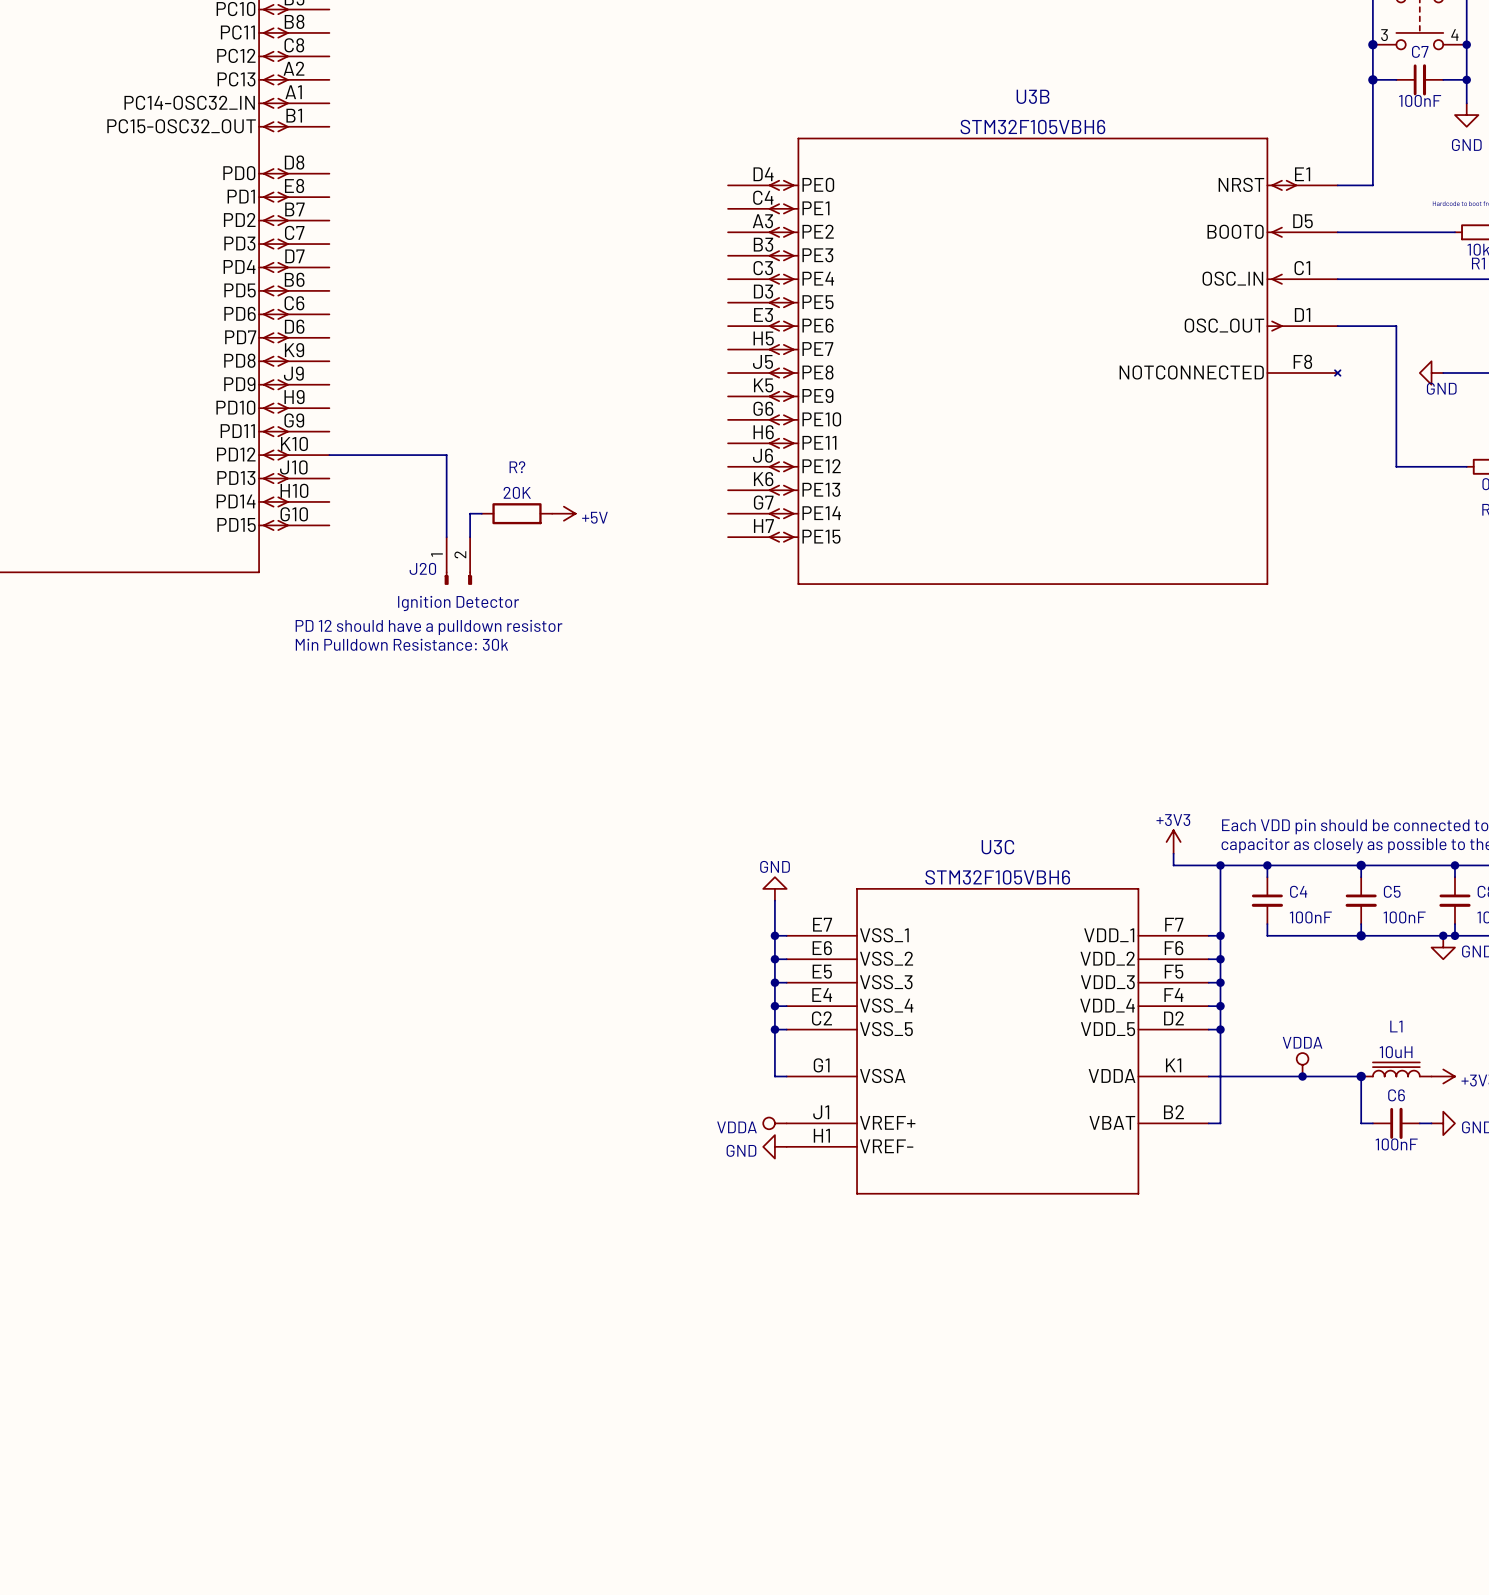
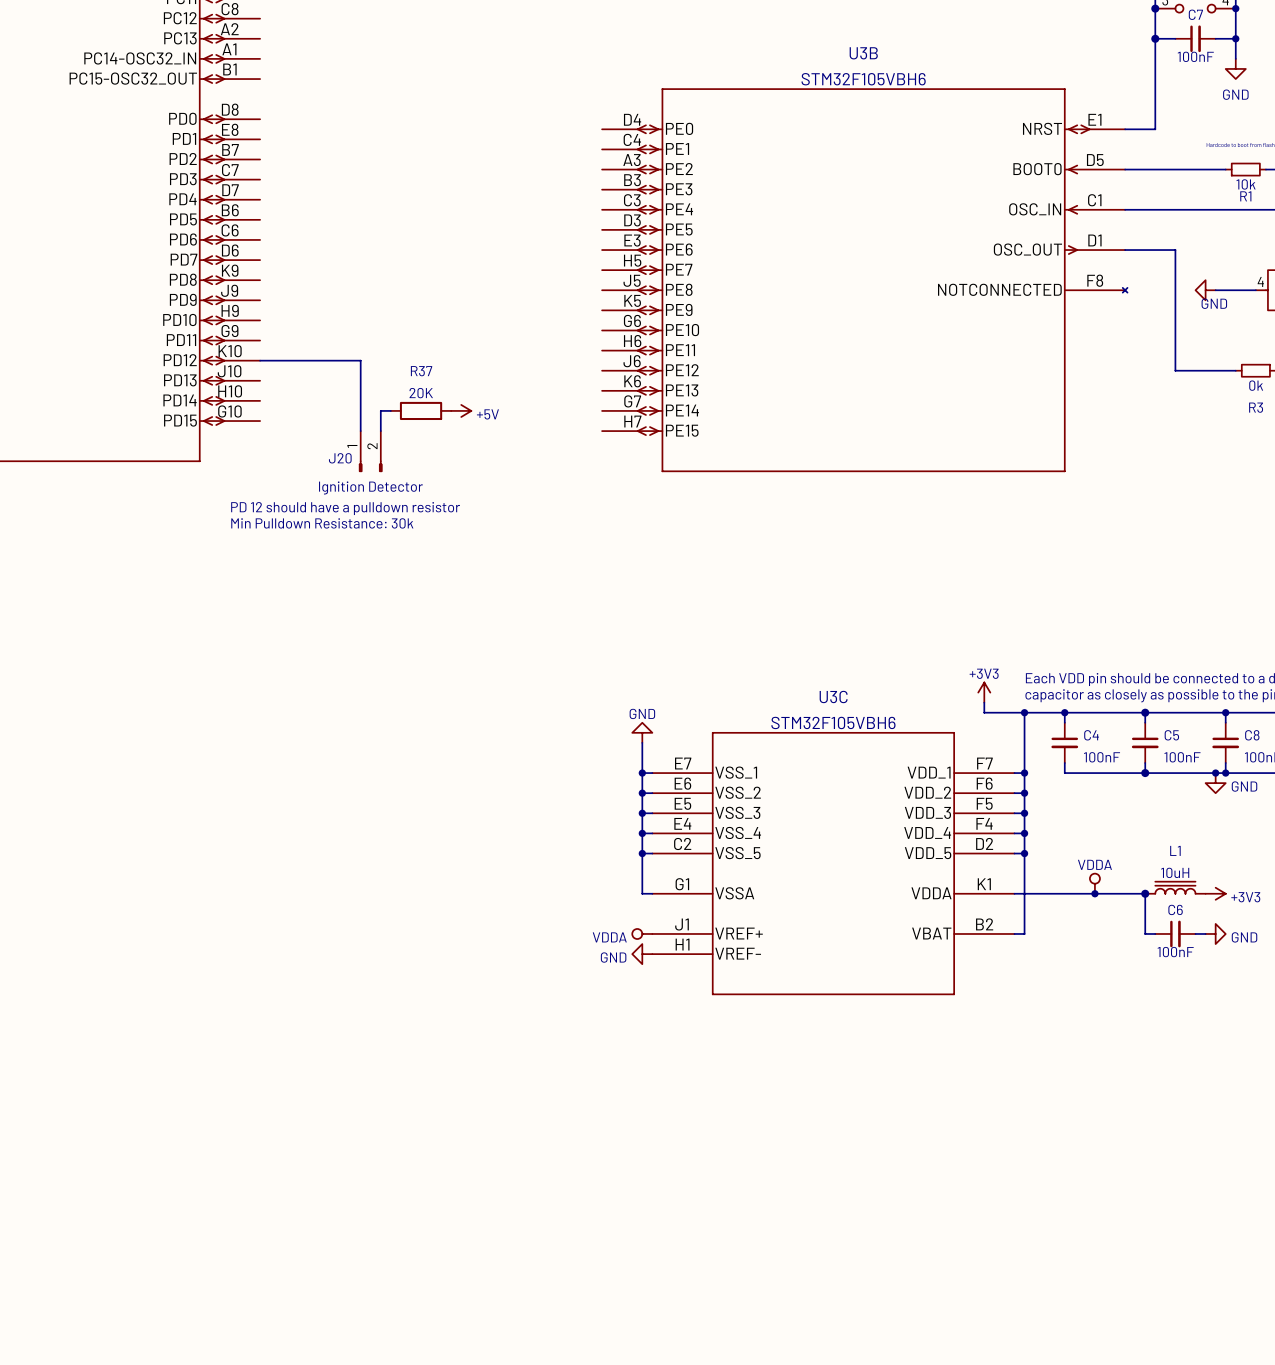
R? name: R? (517, 467) -> R37 (421, 371)

